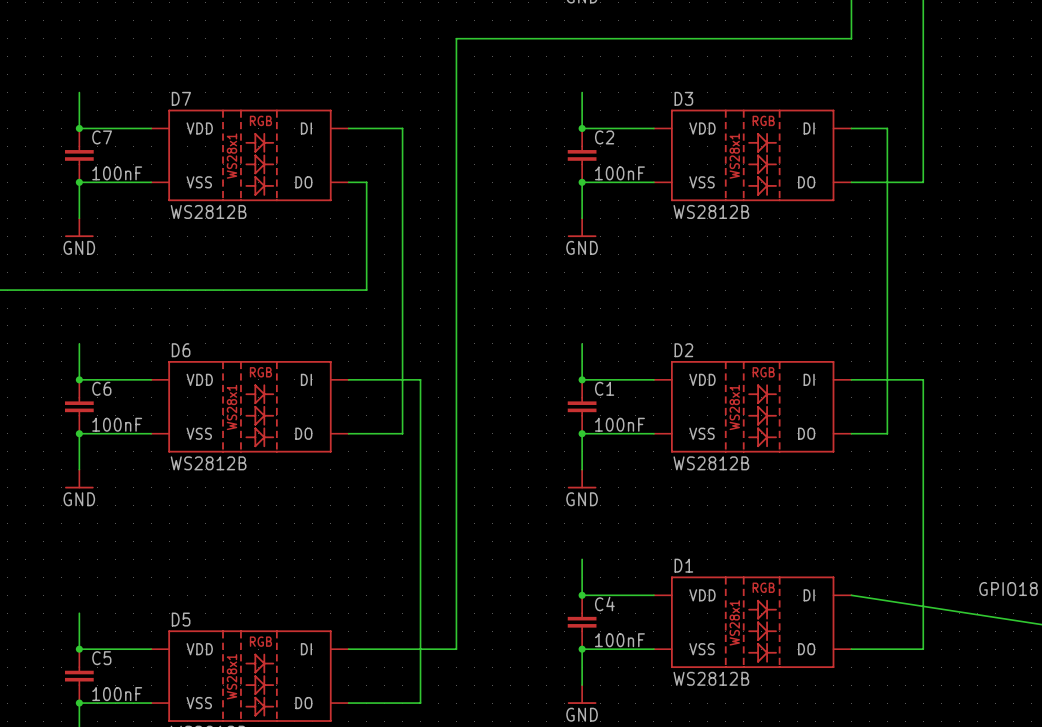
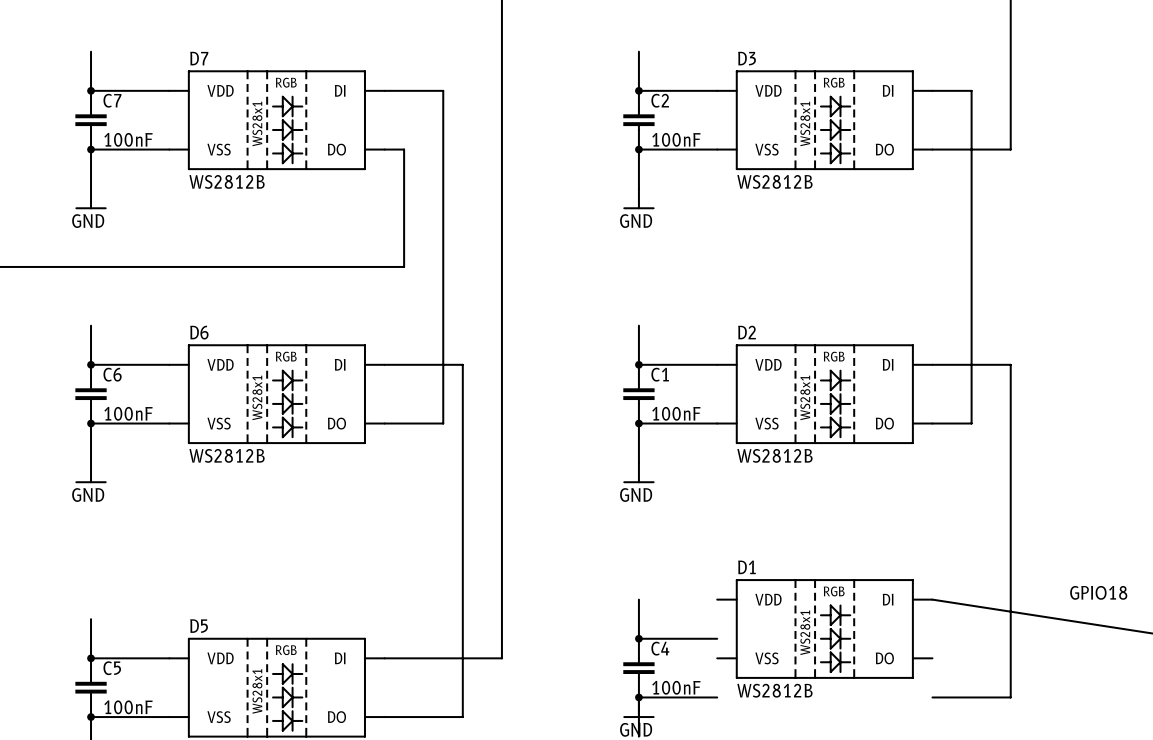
wire: (582, 559) (582, 595) (653, 595) -> (638, 599) (638, 638) (717, 638)
junction: (582, 595) -> none
C4 position: (582, 622) -> (638, 668)
junction: none -> (638, 638)
junction: (582, 649) -> none
wire: (653, 649) (582, 649) (582, 685) -> (717, 697) (638, 697) (638, 736)
wire: (851, 649) (923, 649) -> (932, 697) (1010, 697) (1010, 658)
junction: none -> (638, 697)

